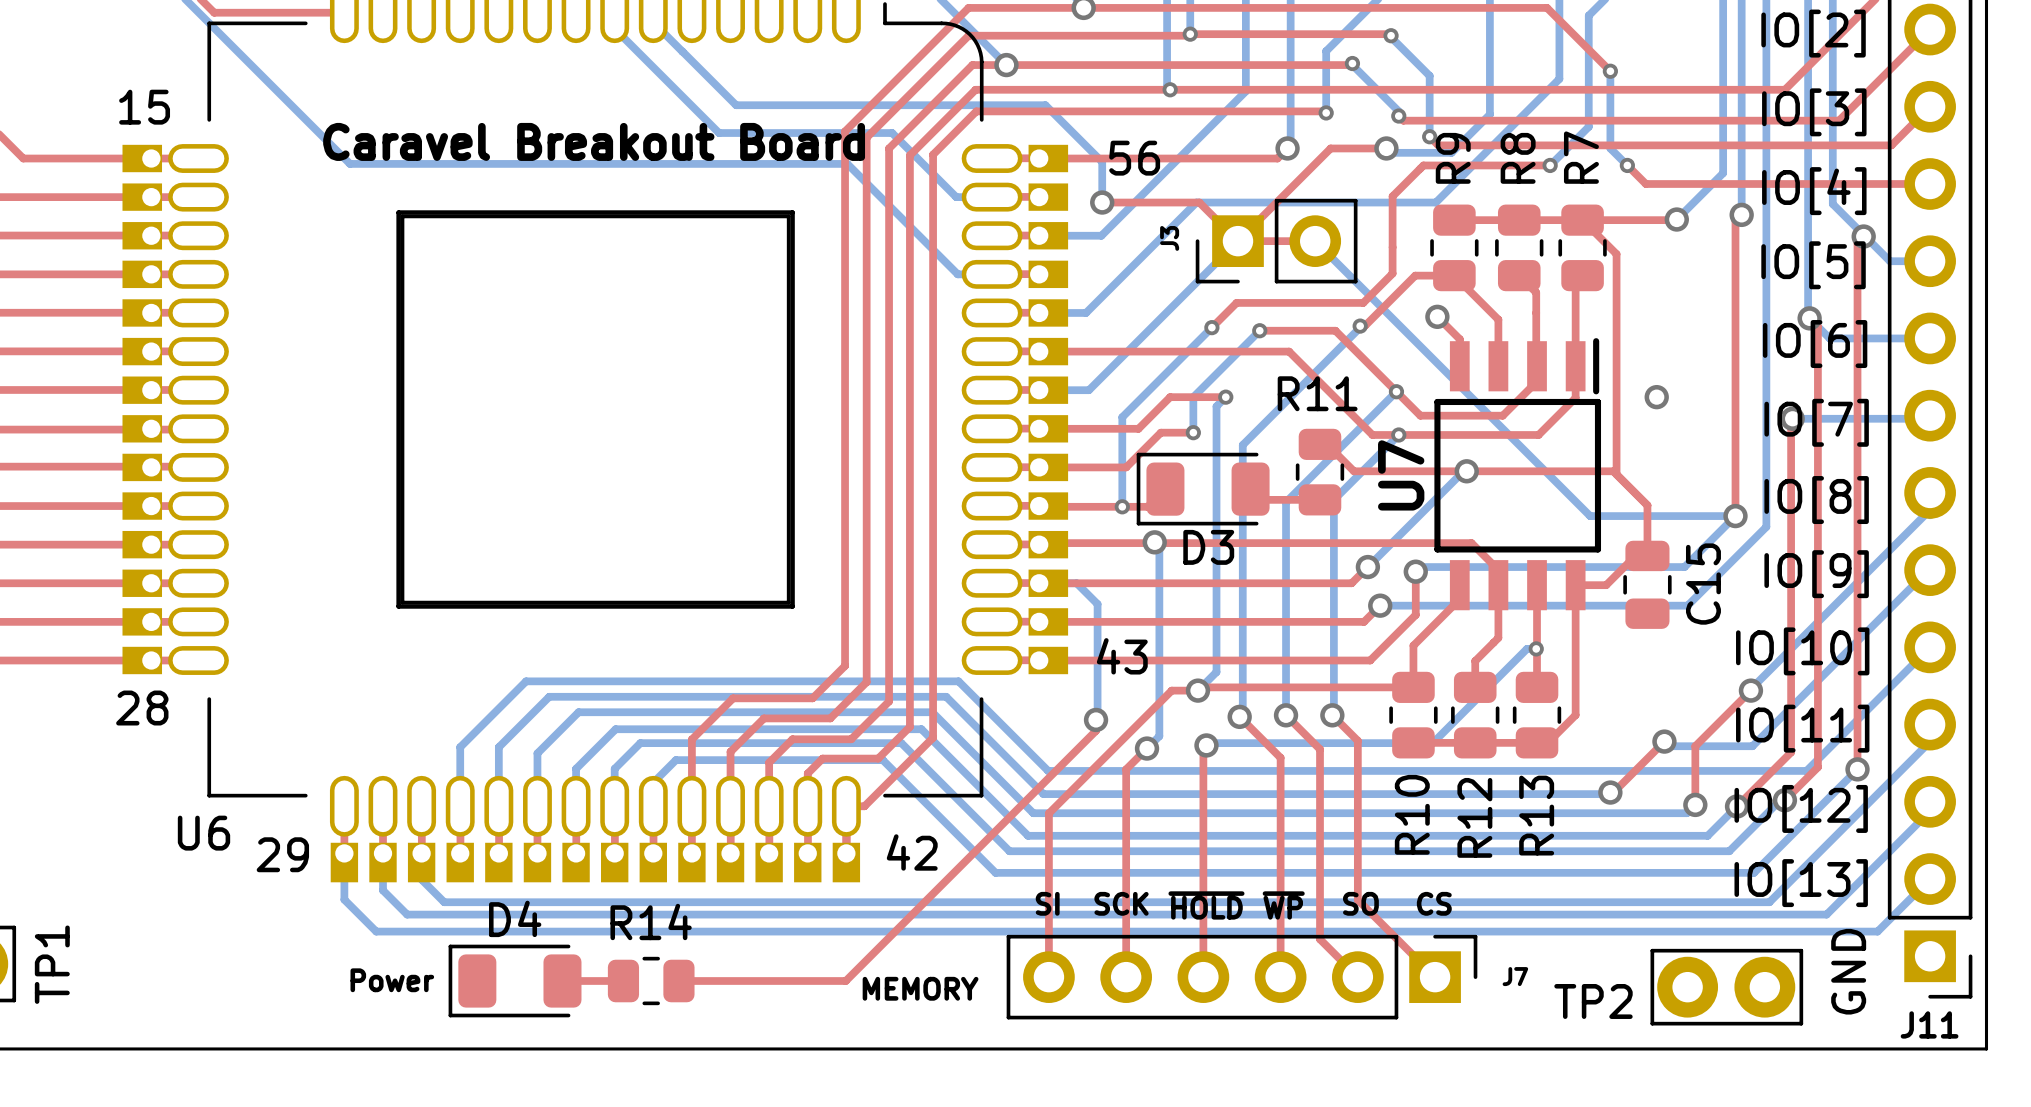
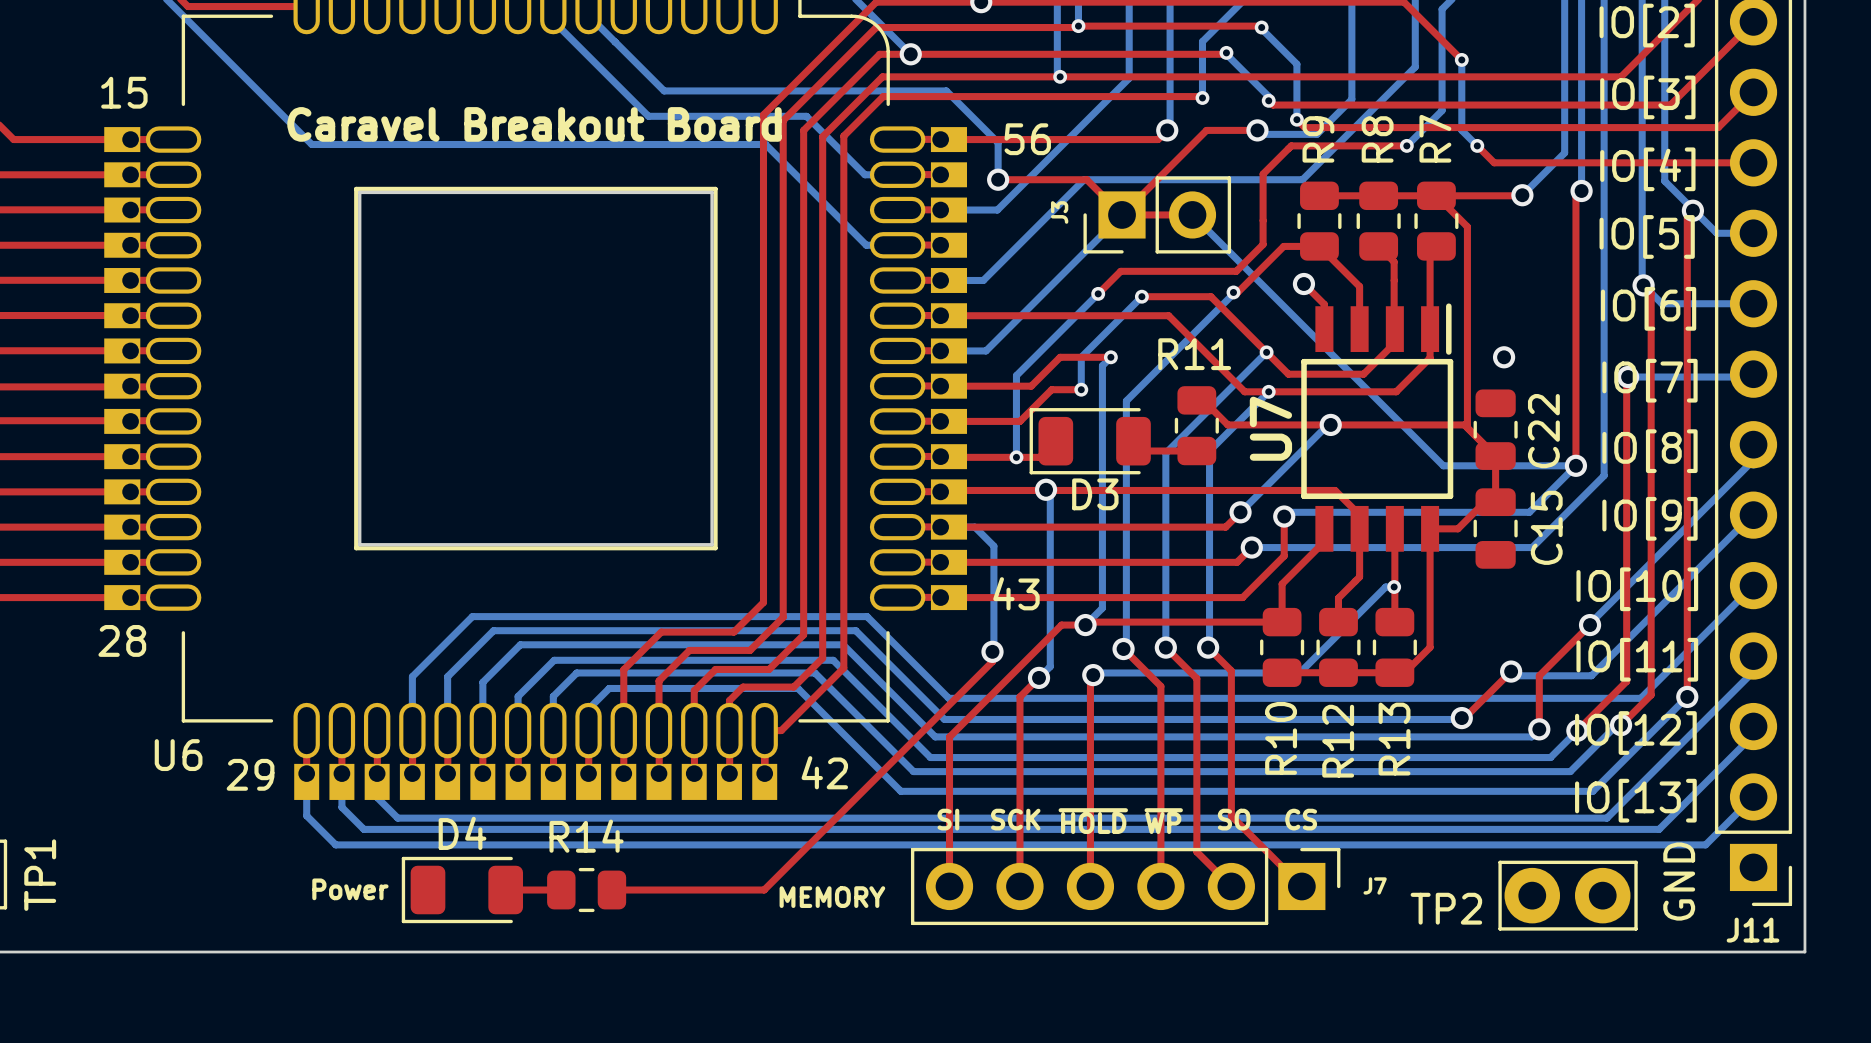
C22: none -> (1495, 429)

